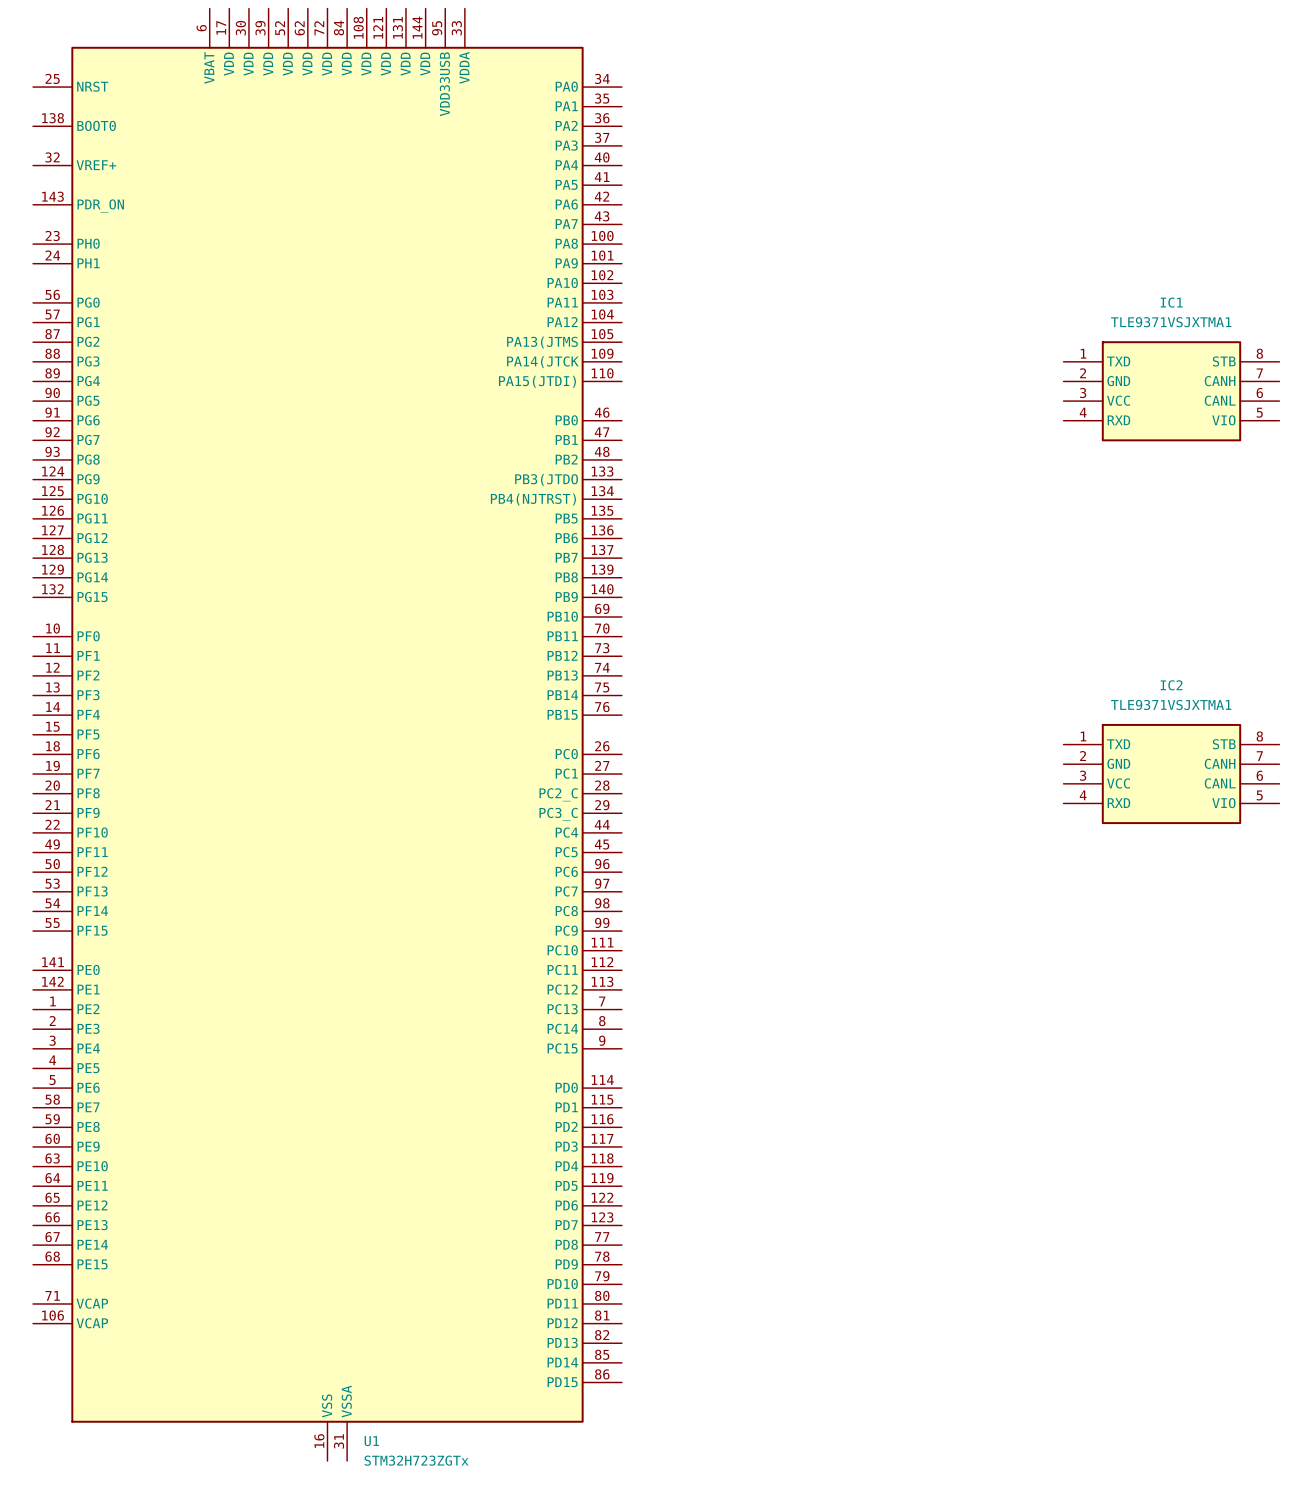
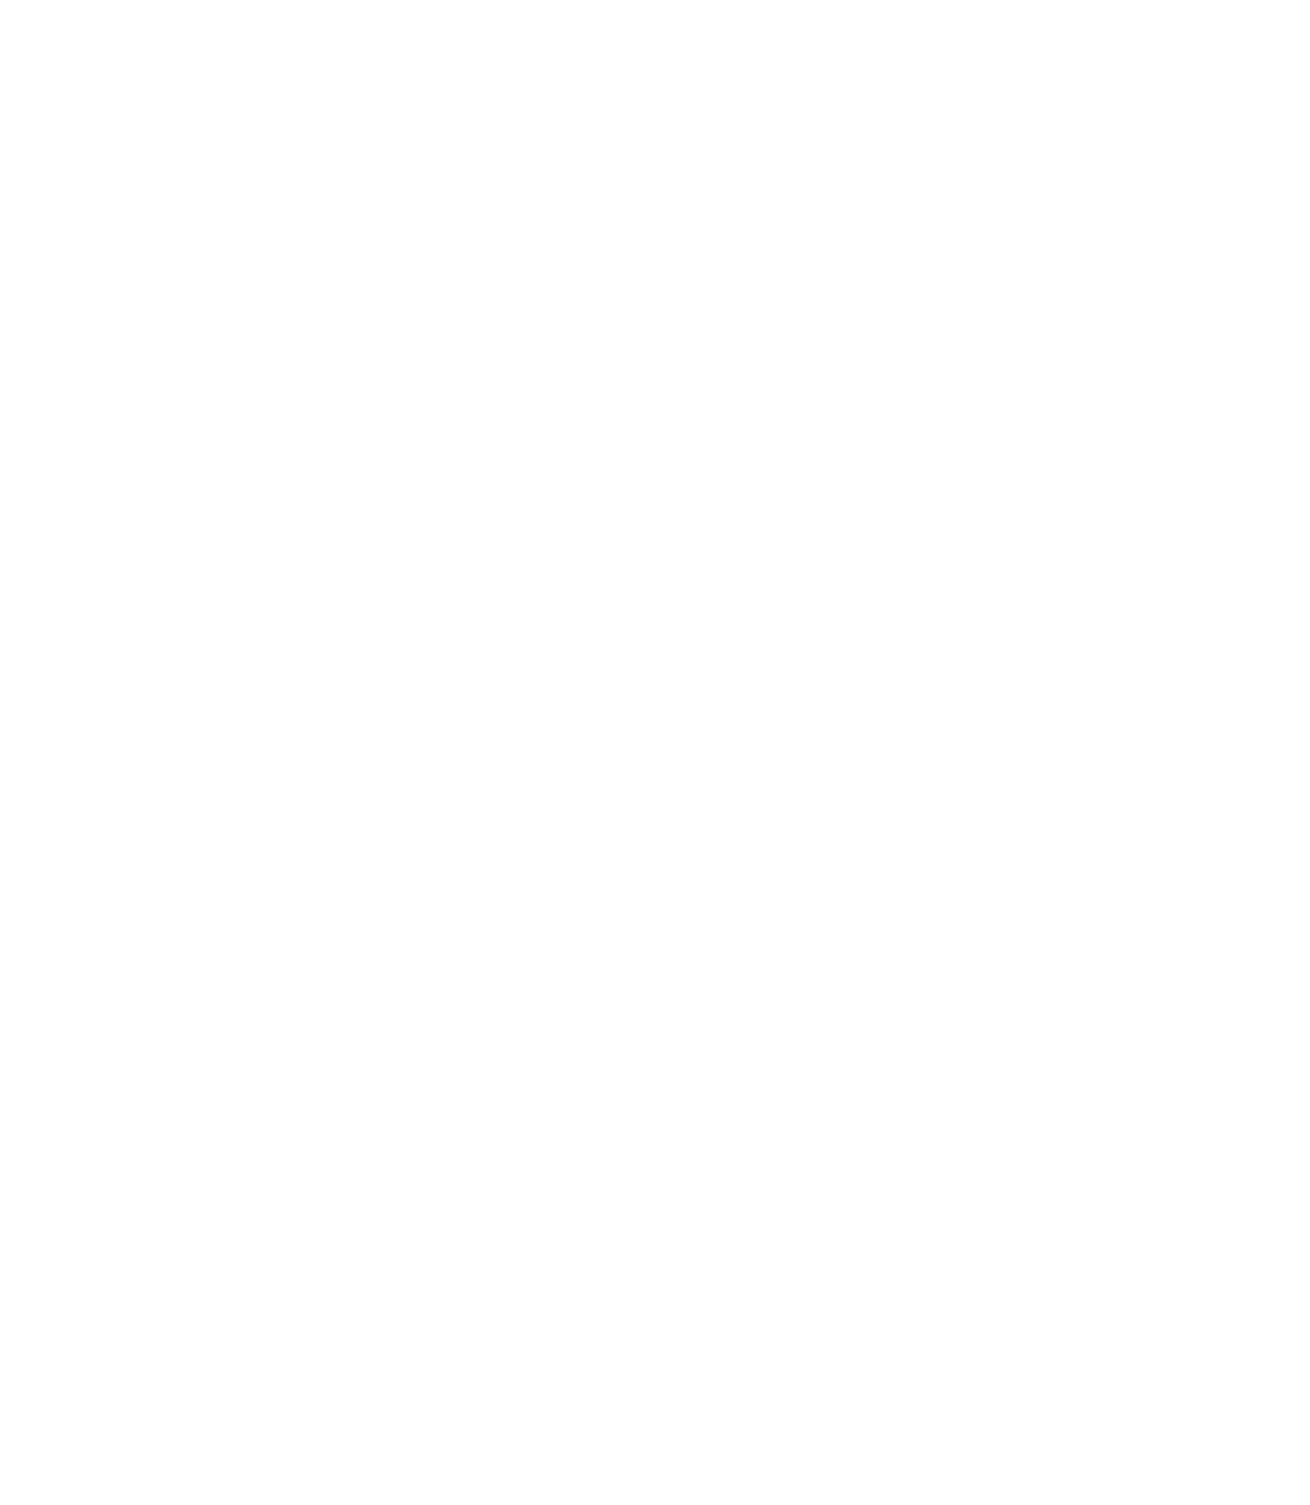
IC1: TLE9371VSJXTMA1 (1171, 391) -> none
U1: STM32H723ZGTx (327, 734) -> none
IC2: TLE9371VSJXTMA1 (1171, 774) -> none

